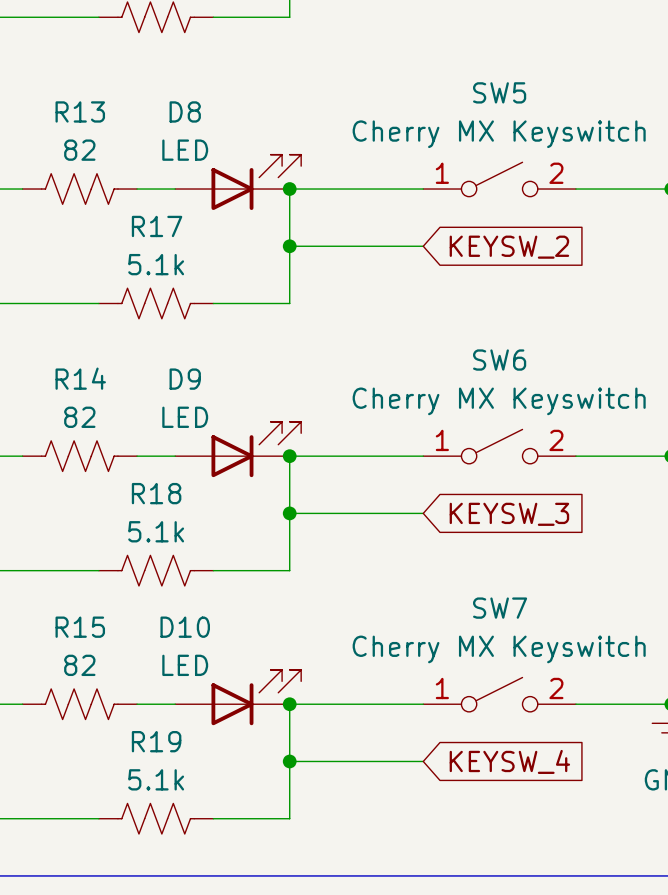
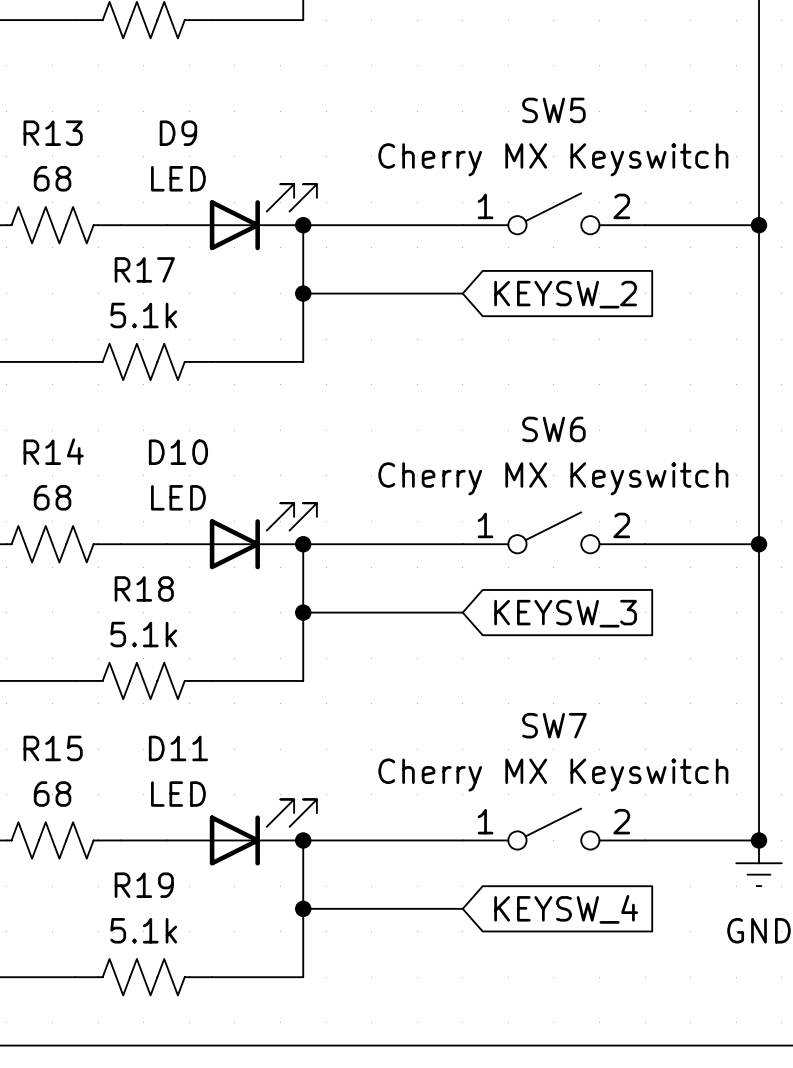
D8 name: D8 (185, 111) -> D9 (178, 133)
R13 value: 82 (79, 150) -> 68 (52, 178)
D9 name: D9 (185, 379) -> D10 (178, 452)
R14 value: 82 (79, 417) -> 68 (52, 497)
D10 name: D10 (185, 627) -> D11 (178, 748)
R15 value: 82 (79, 665) -> 68 (52, 794)

